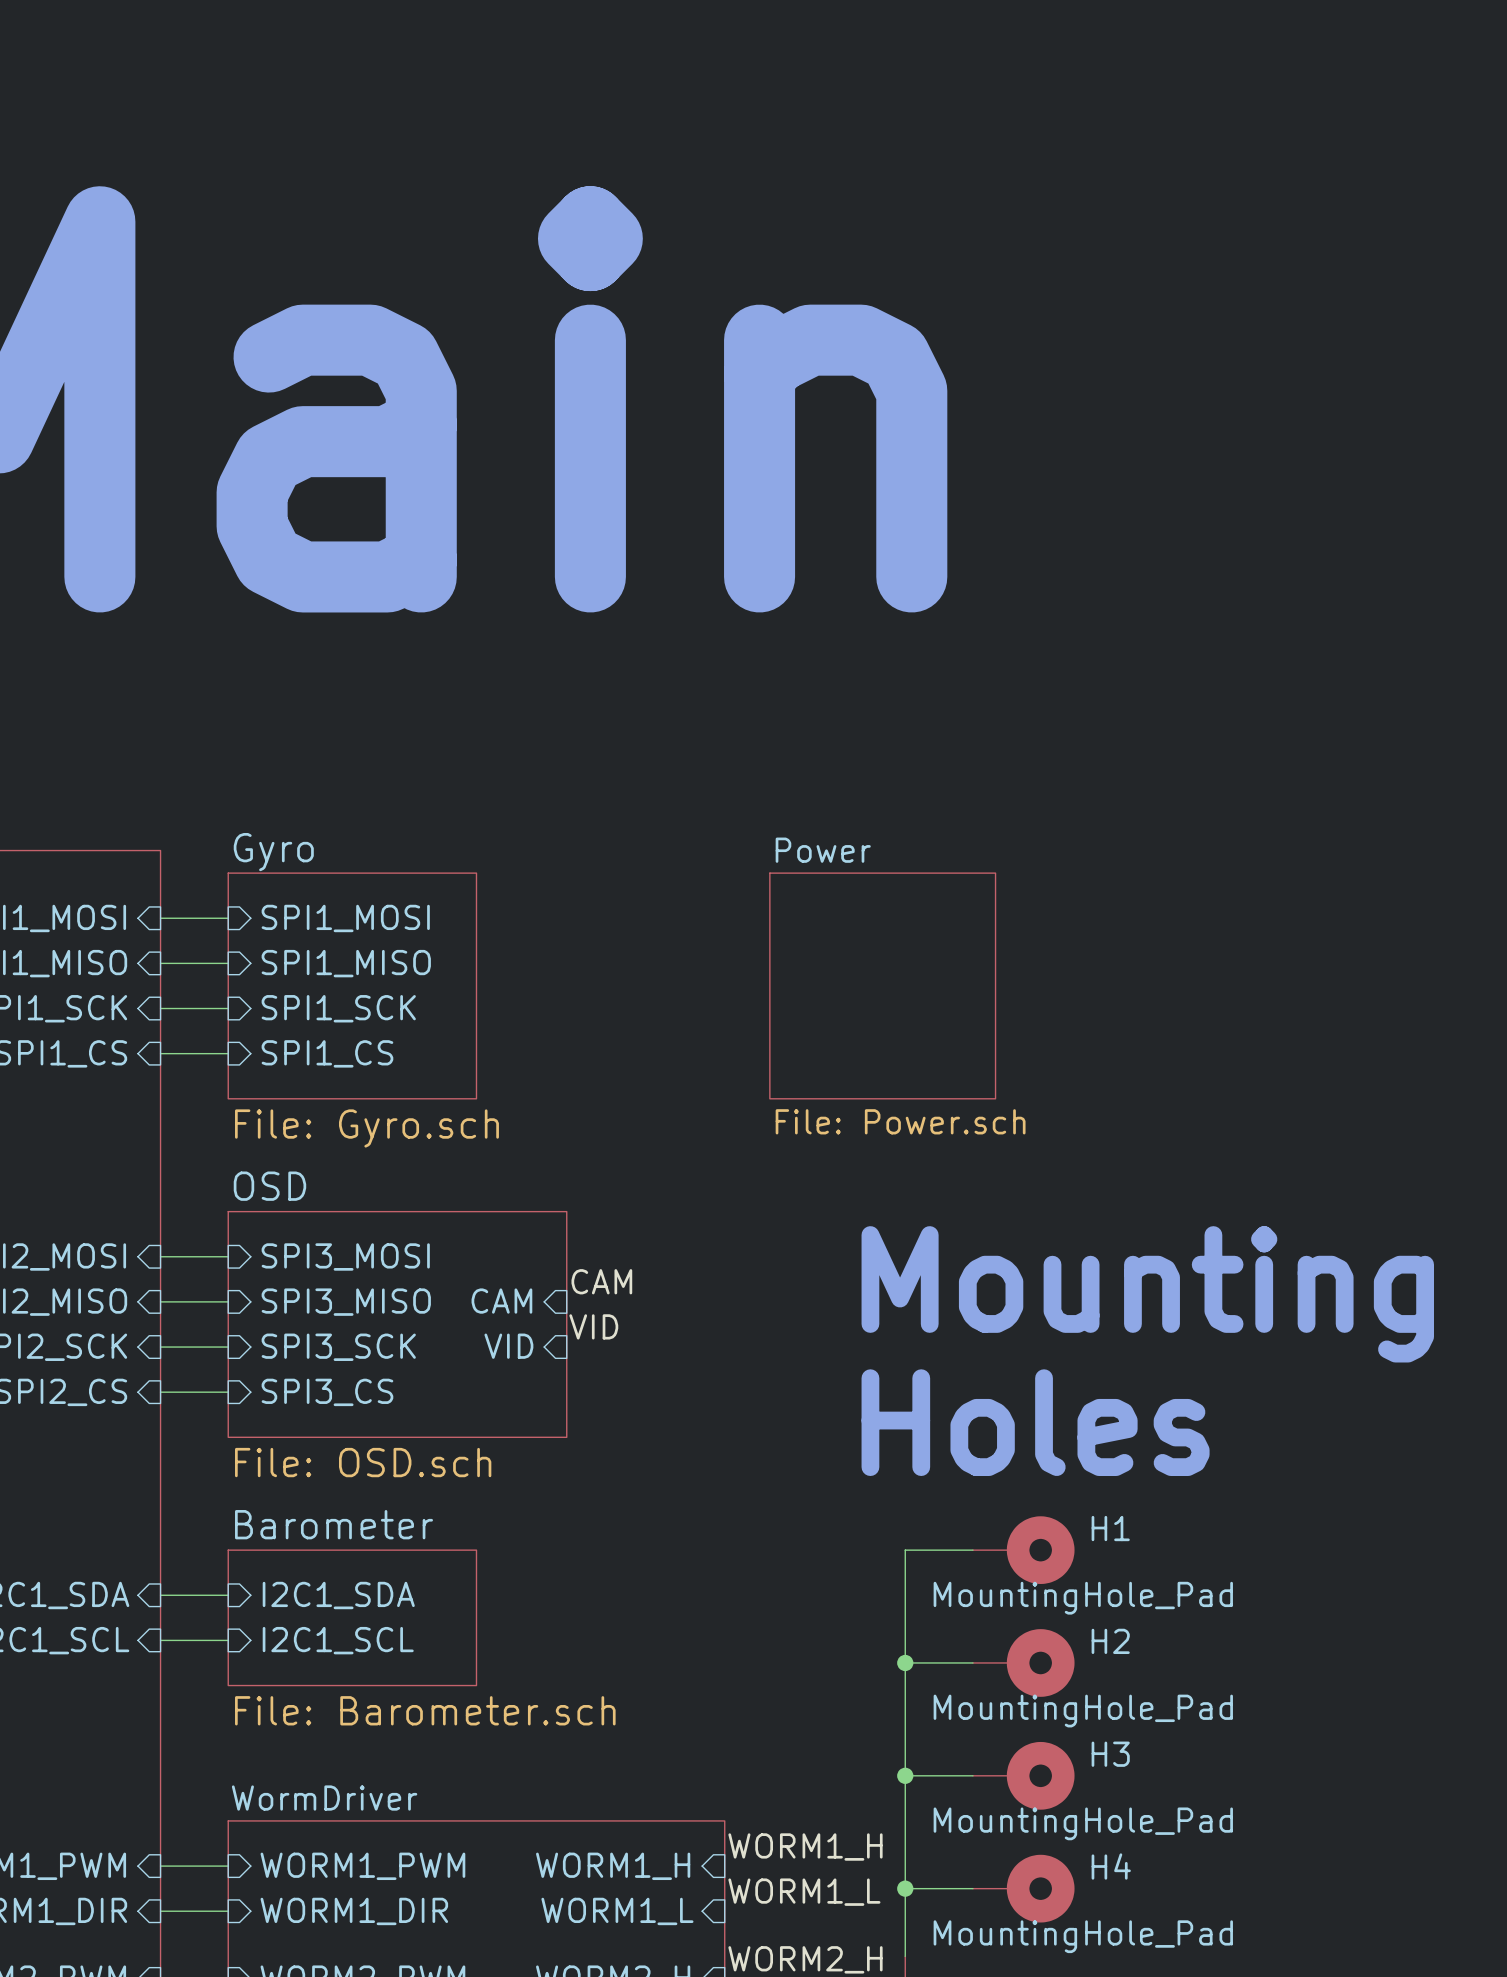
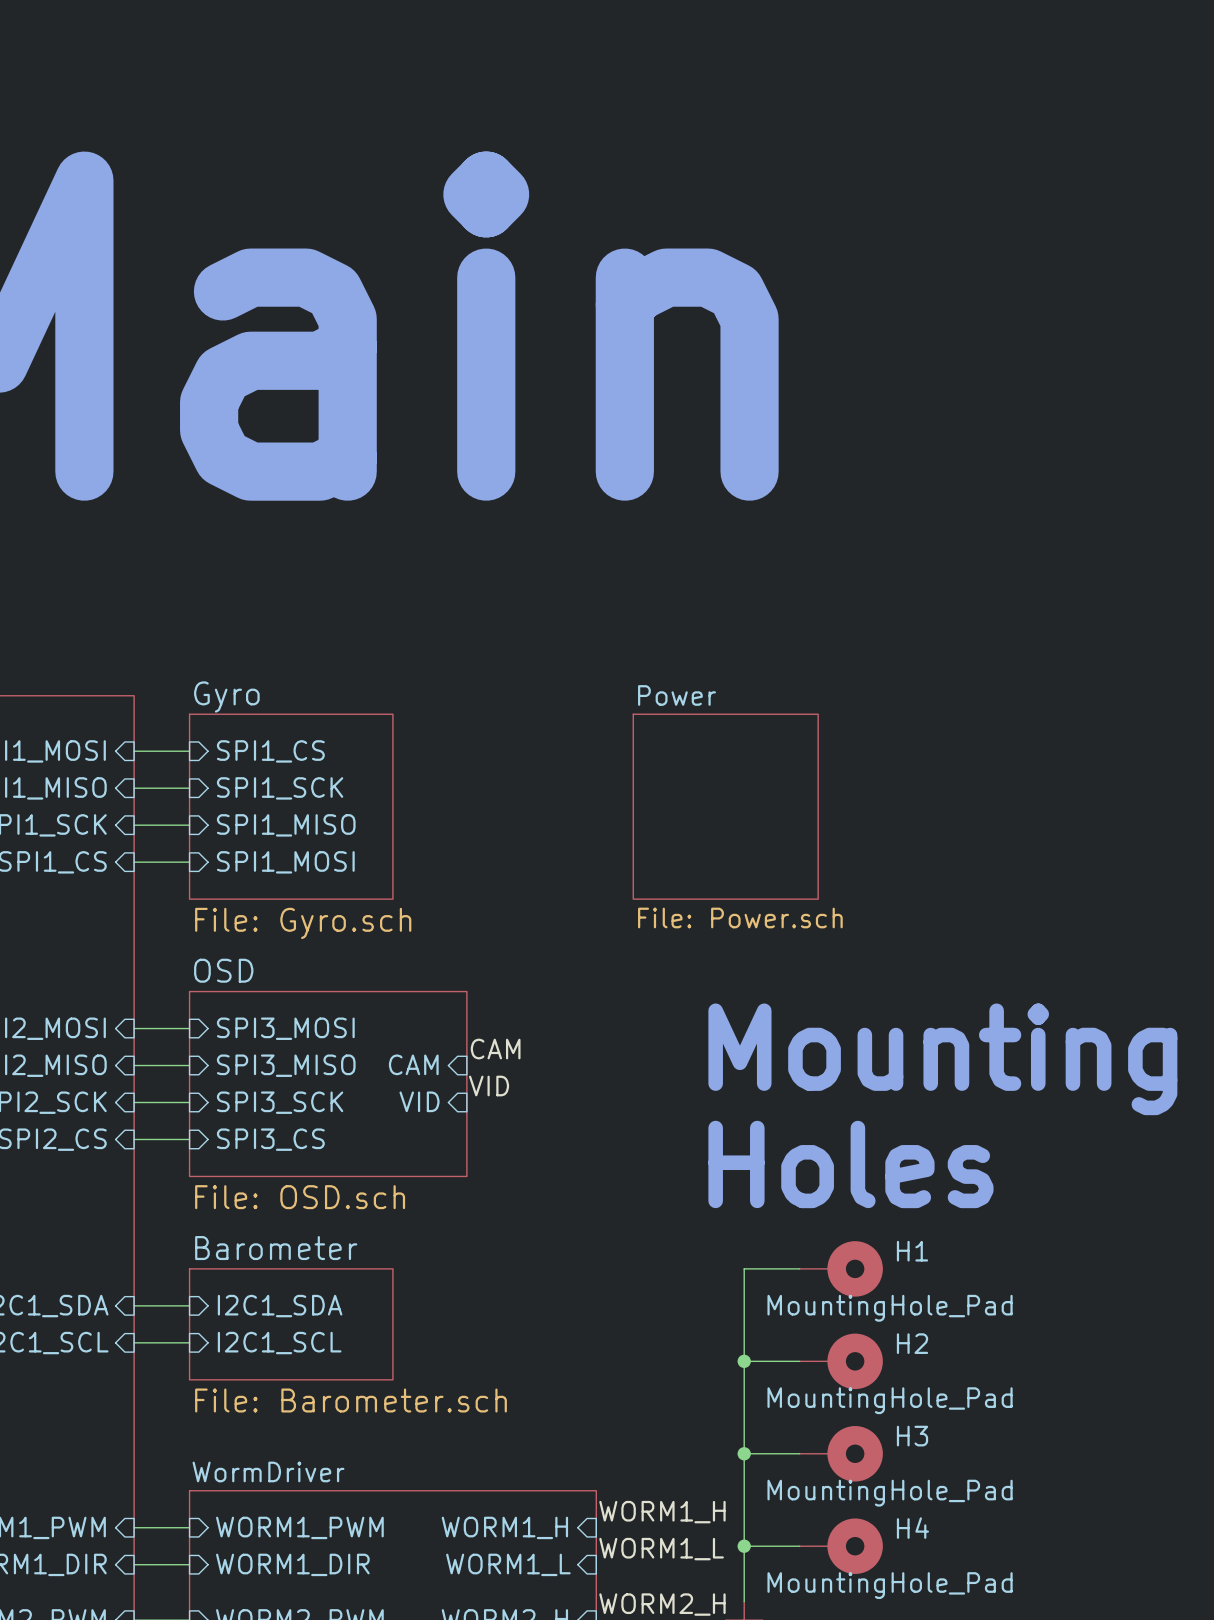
sheet pin: SPI1_MOSI (345, 918) -> SPI1_CS (270, 751)
sheet pin: SPI1_MISO (346, 963) -> SPI1_SCK (280, 788)
sheet pin: SPI1_SCK (338, 1008) -> SPI1_MISO (286, 825)
sheet pin: SPI1_CS (327, 1053) -> SPI1_MOSI (285, 862)

